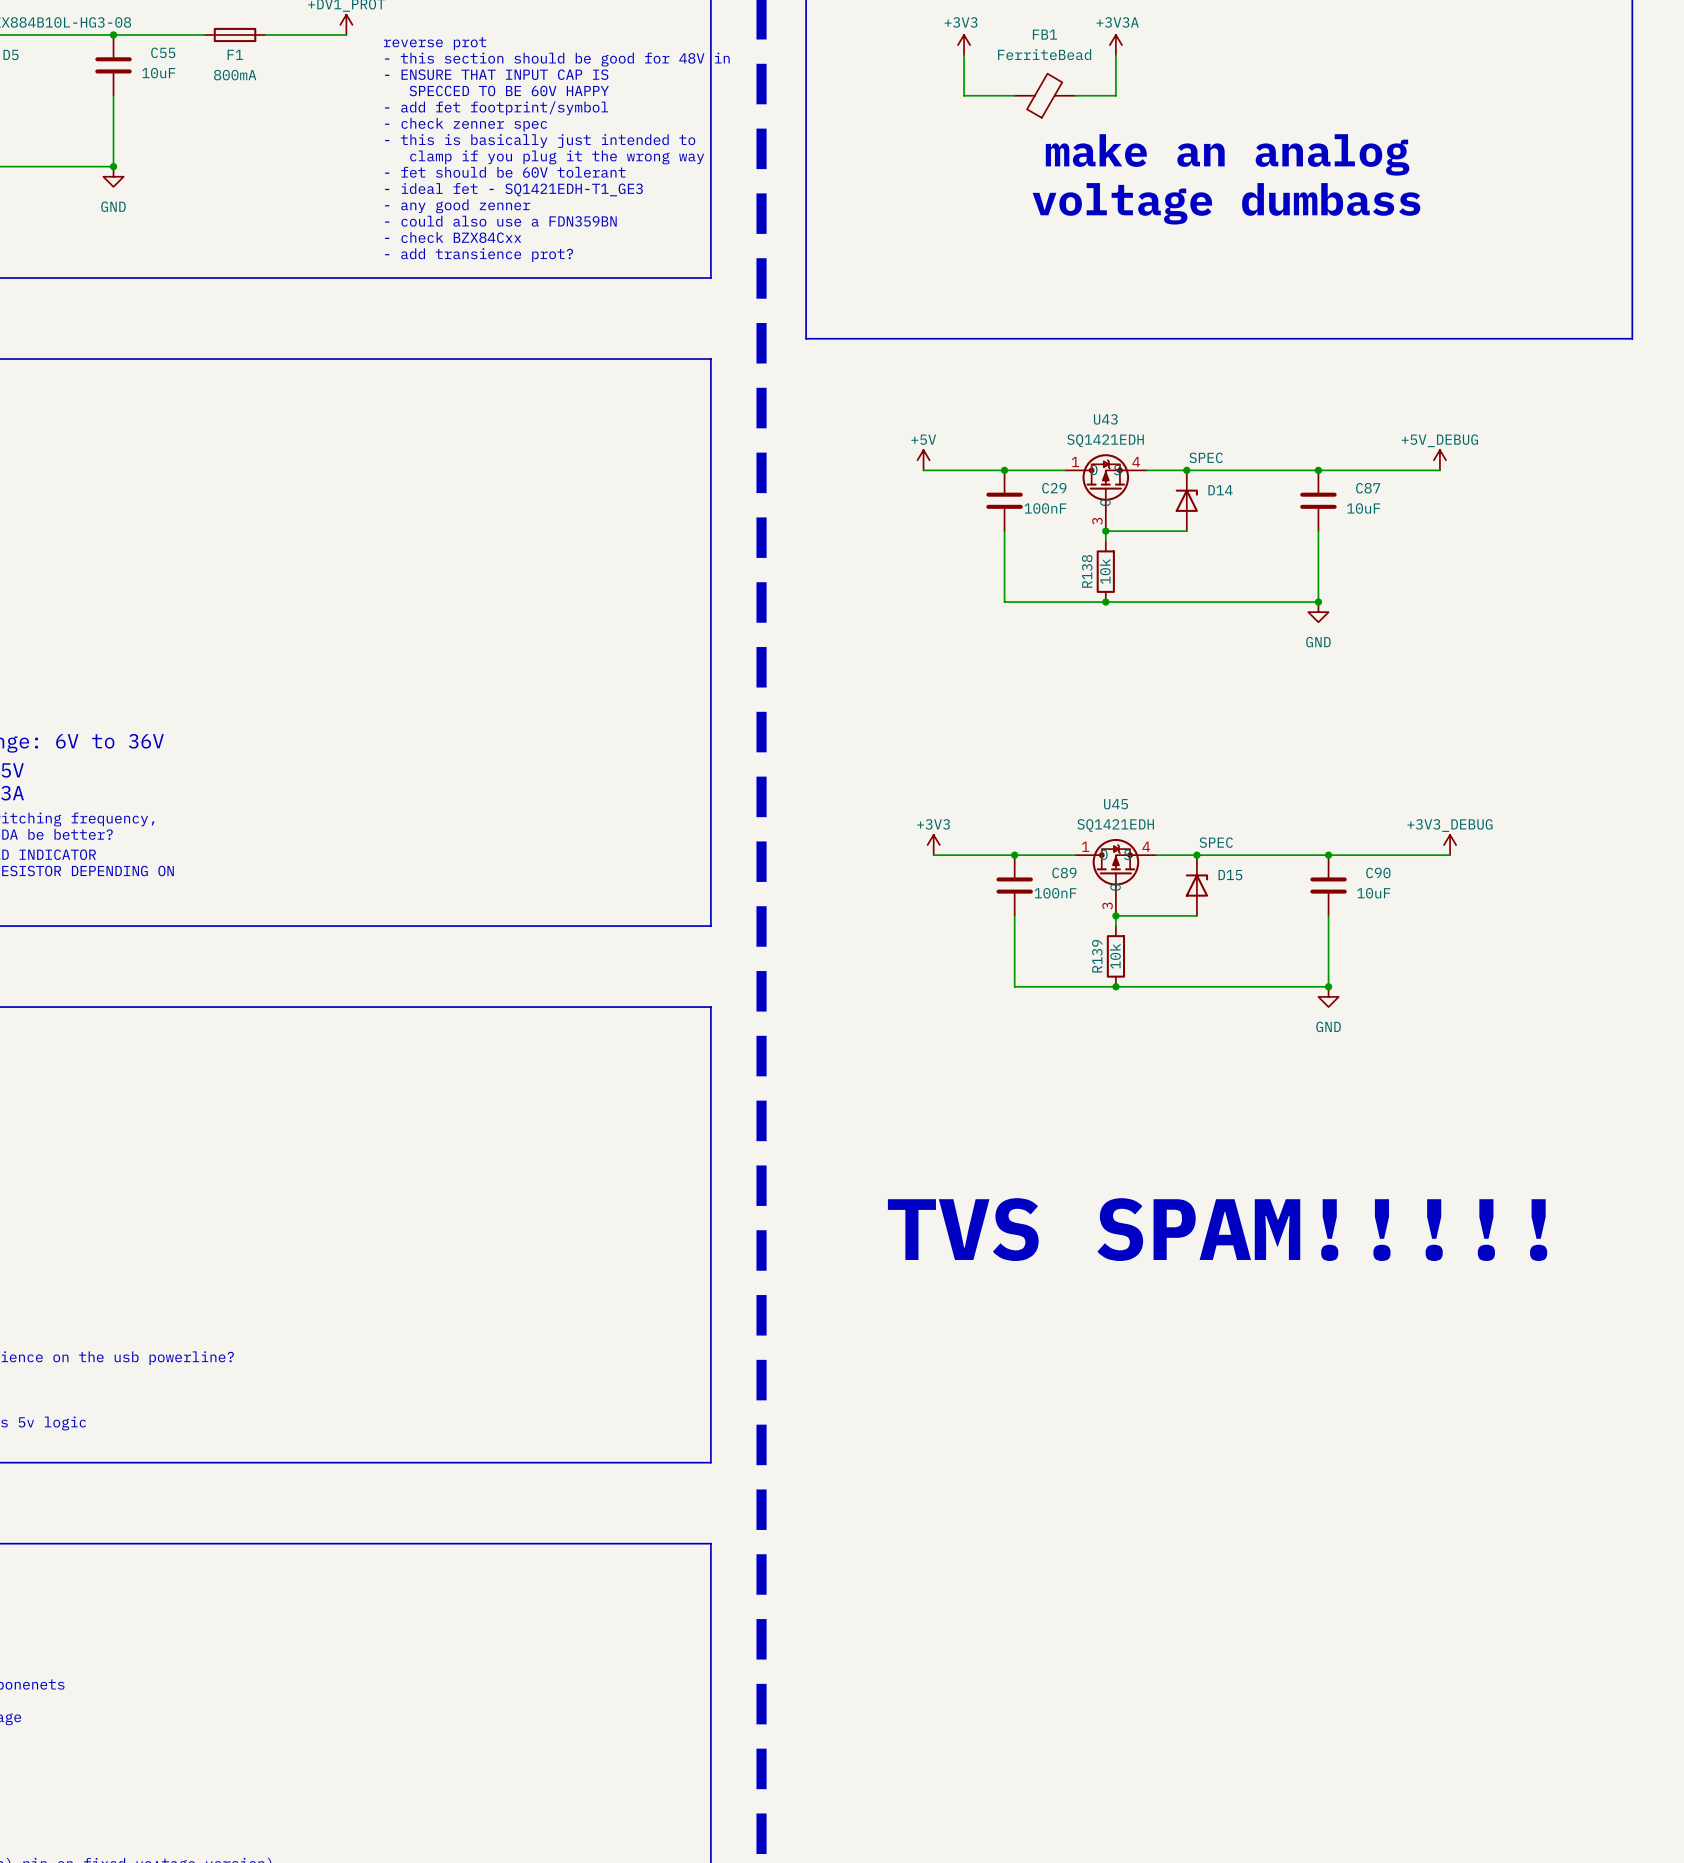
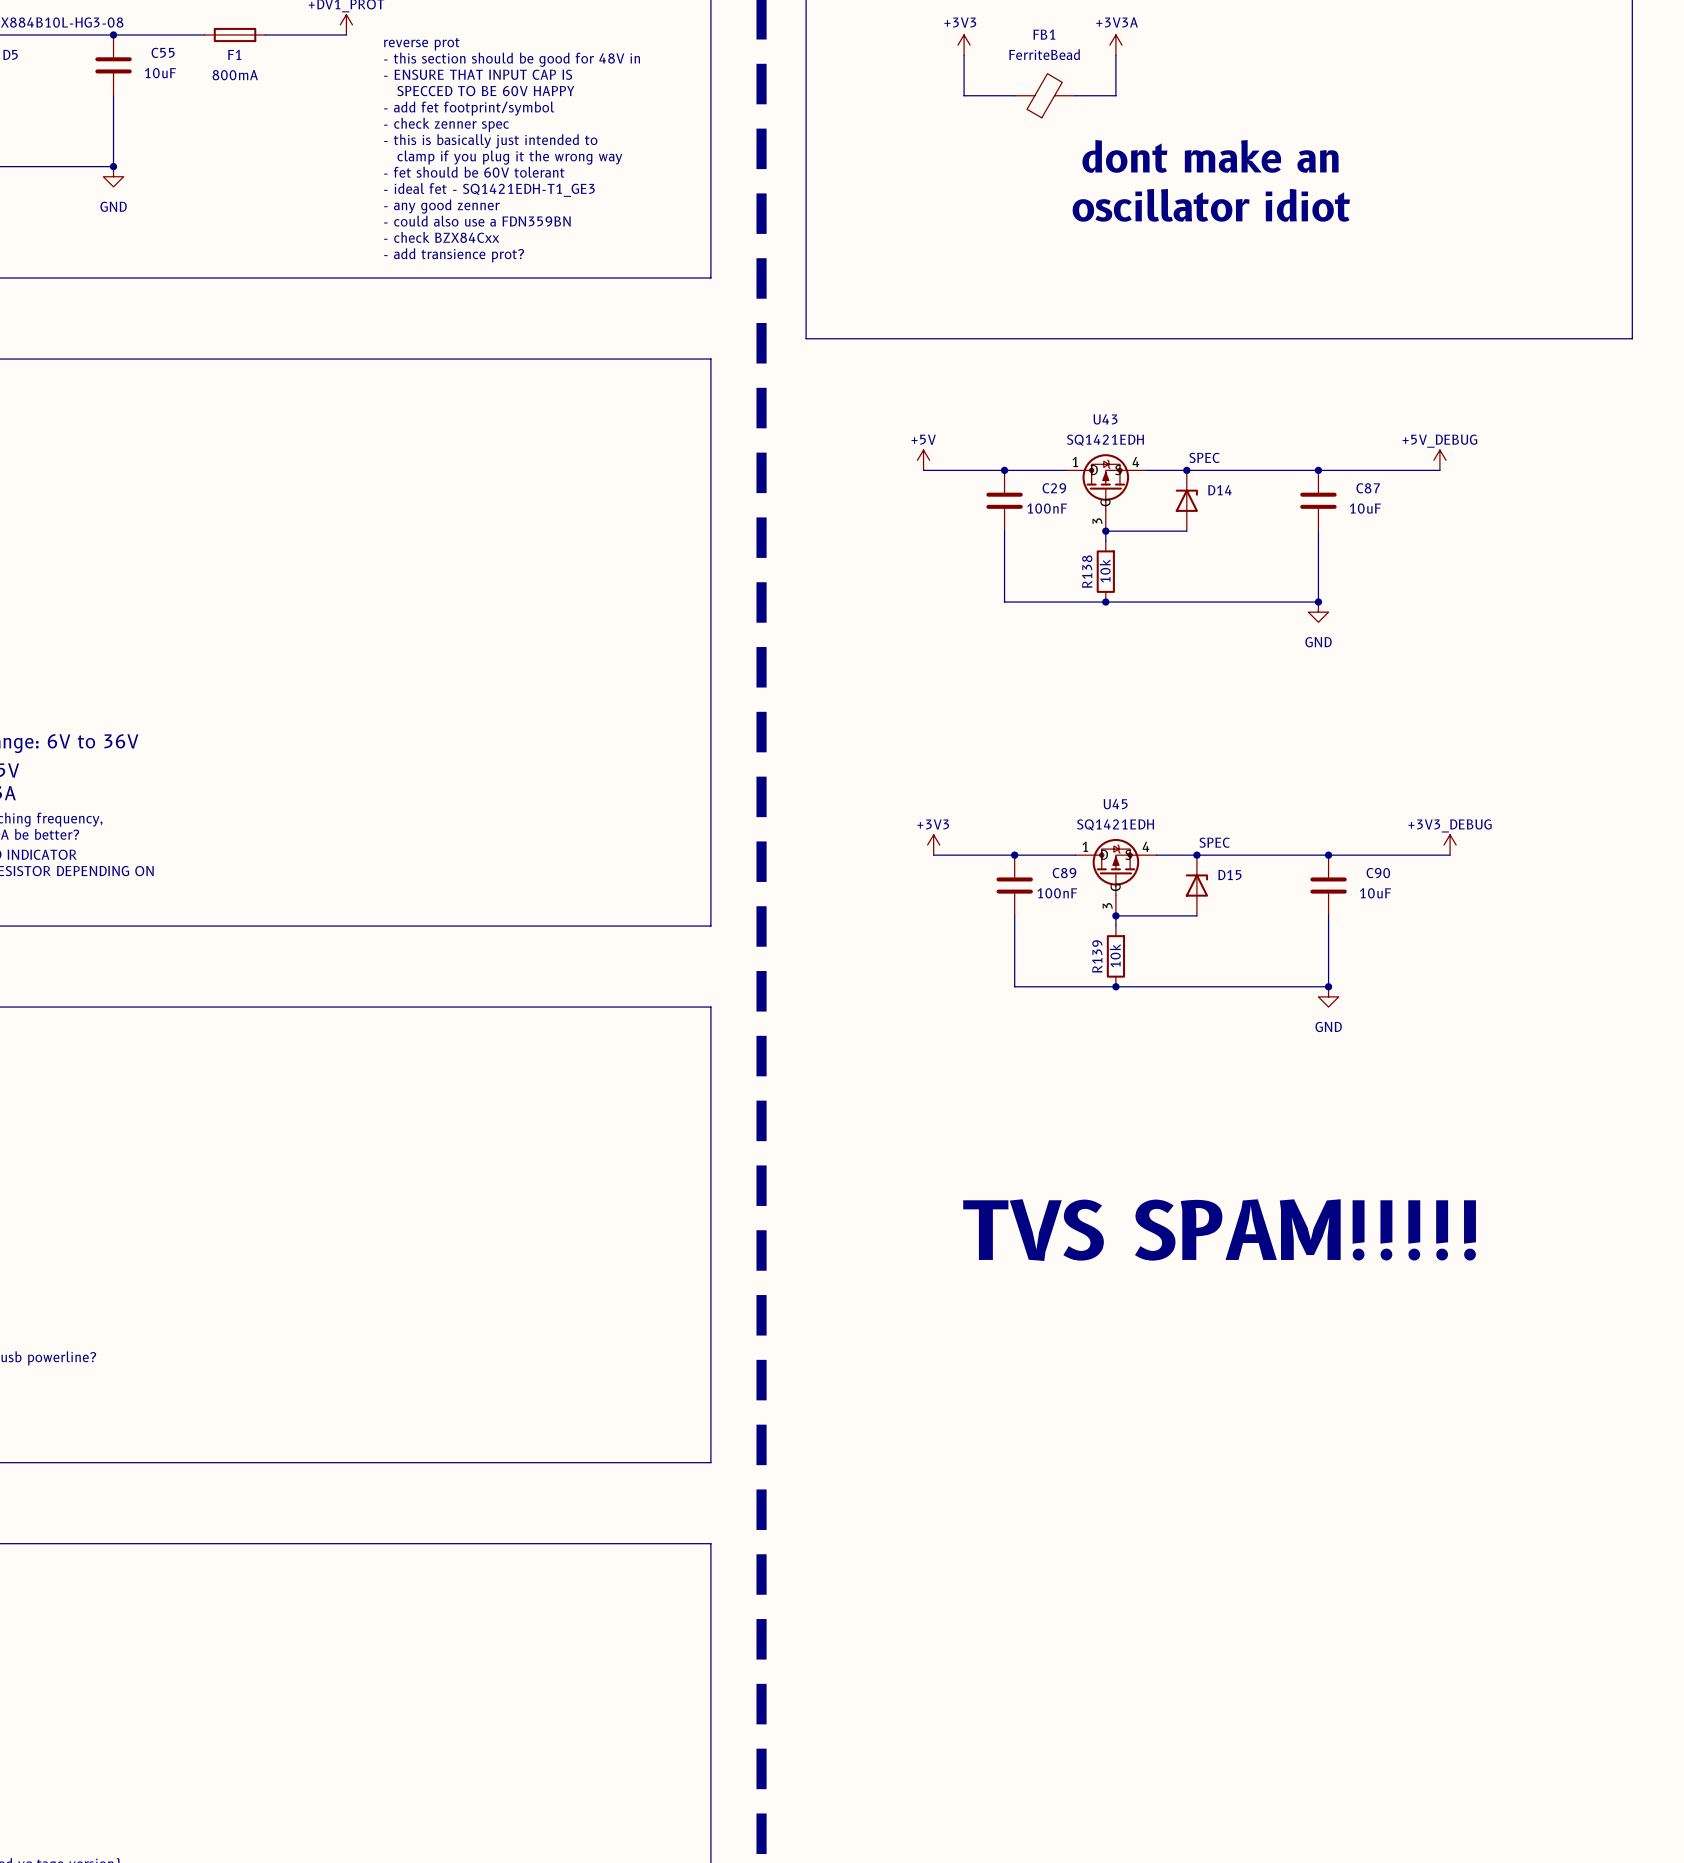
text: make an analog (1227, 154) -> none
text: none -> dont make an (1210, 156)
text: voltage dumbass (1226, 203) -> none
text: none -> oscillator idiot (1211, 205)

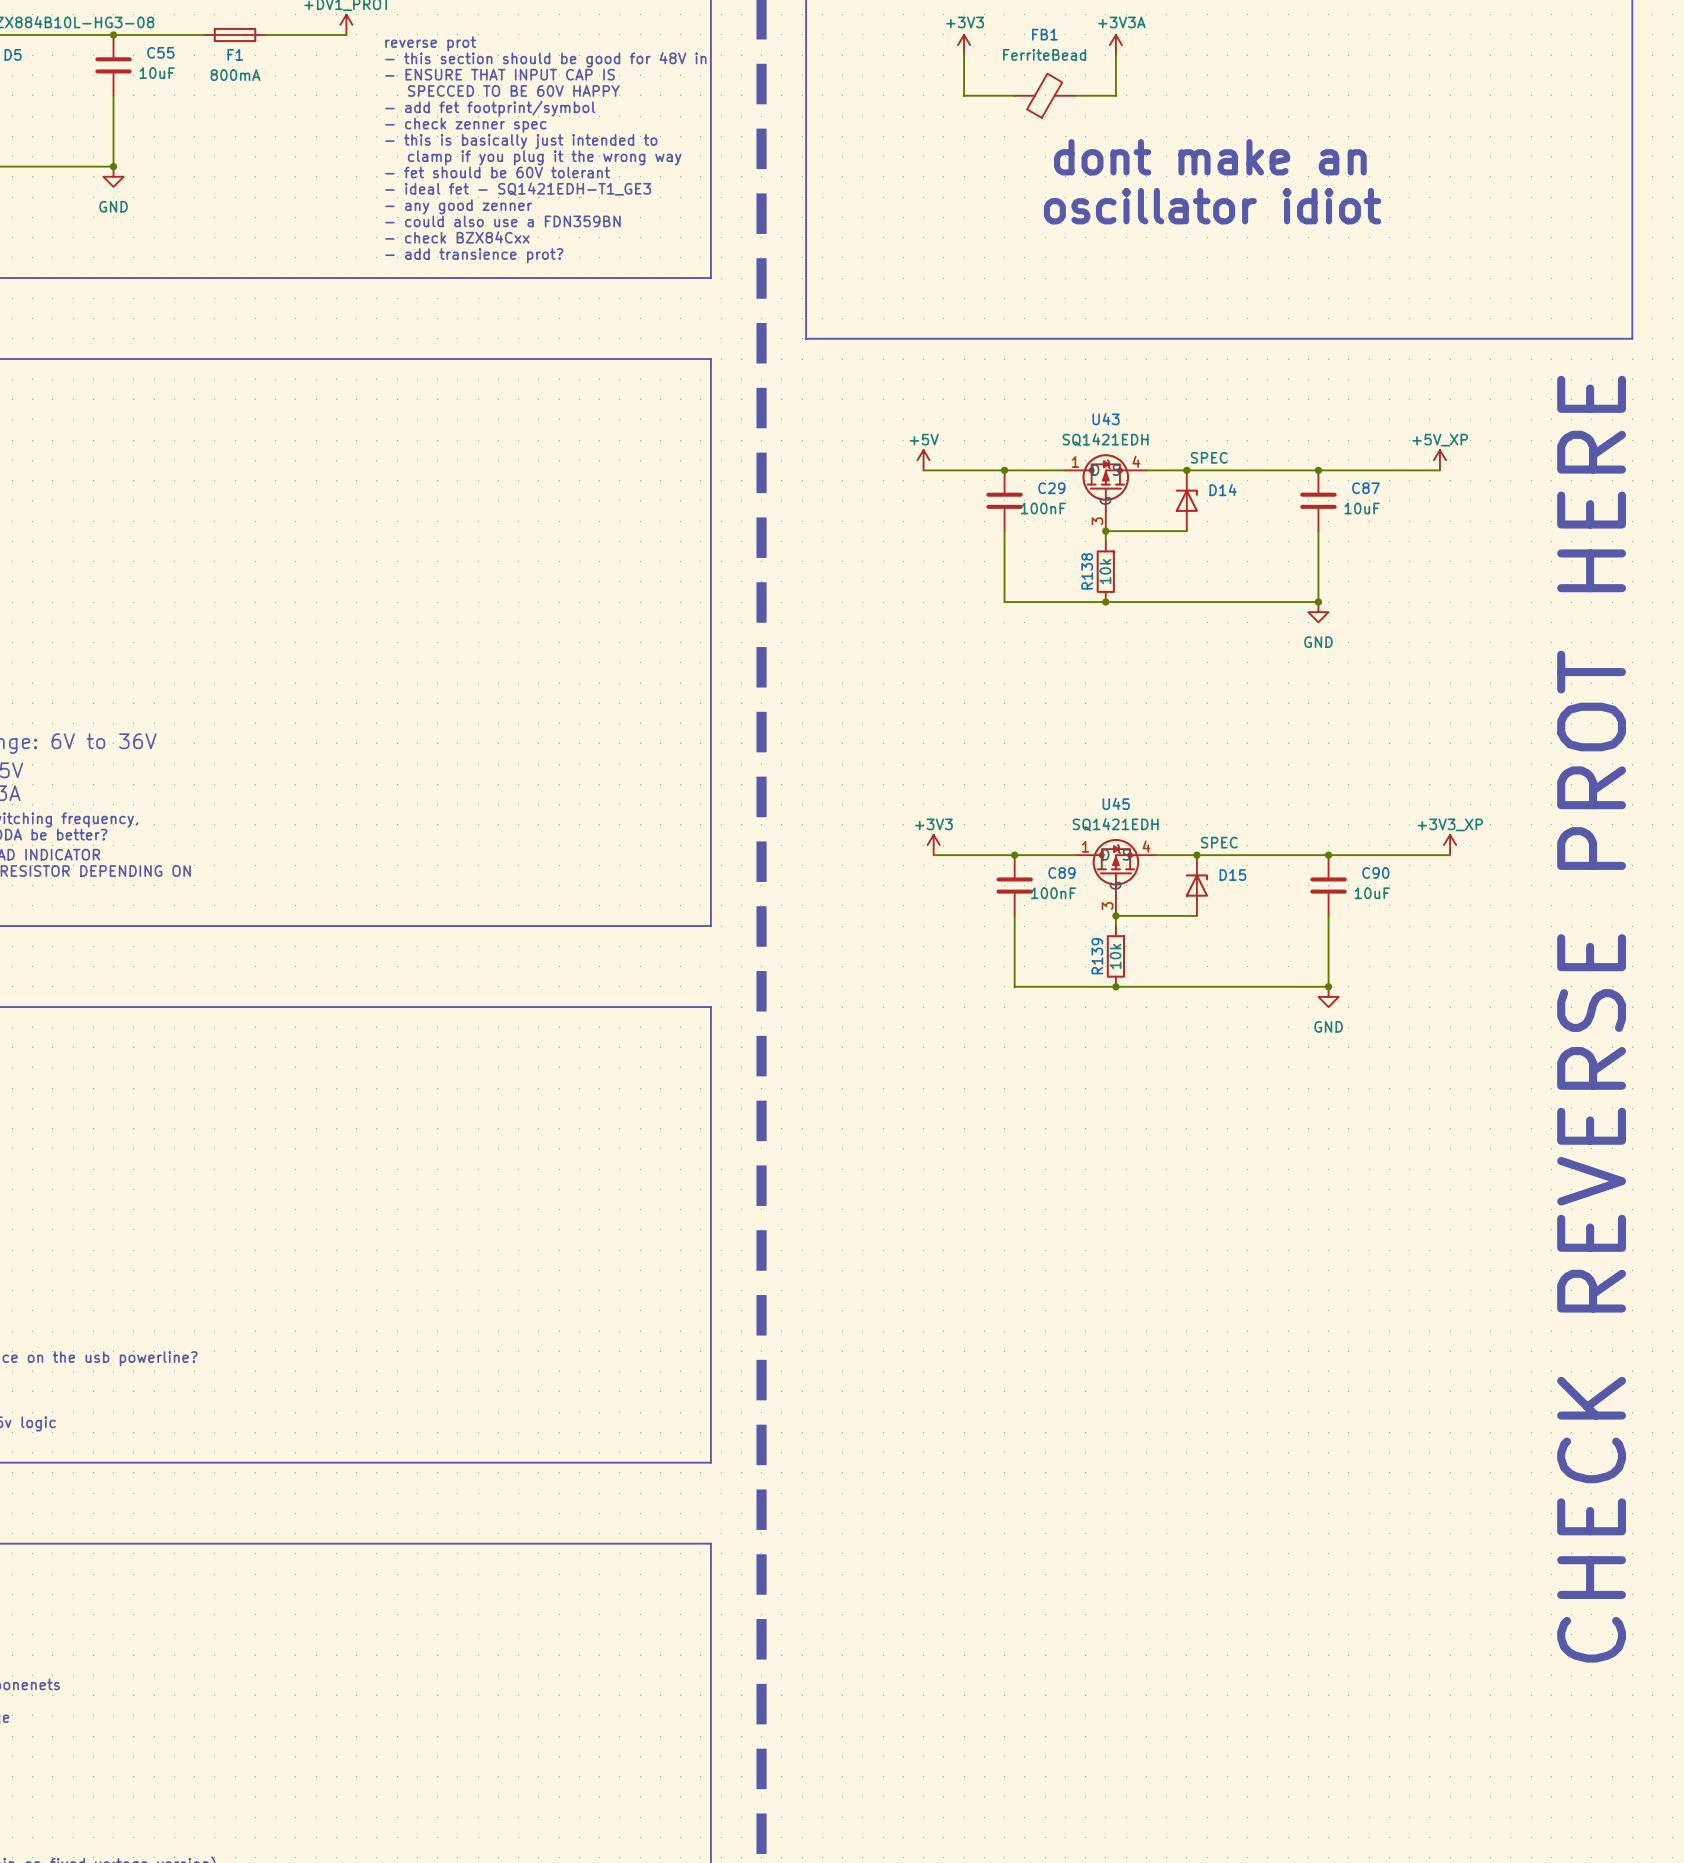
power symbol: +5V_DEBUG (1439, 460) -> +5V_XP (1439, 460)
power symbol: +3V3_DEBUG (1450, 845) -> +3V3_XP (1450, 845)
text: none -> CHECK REVERSE PROT HERE (1591, 1019)
text: TVS SPAM!!!!! (1219, 1230) -> none

